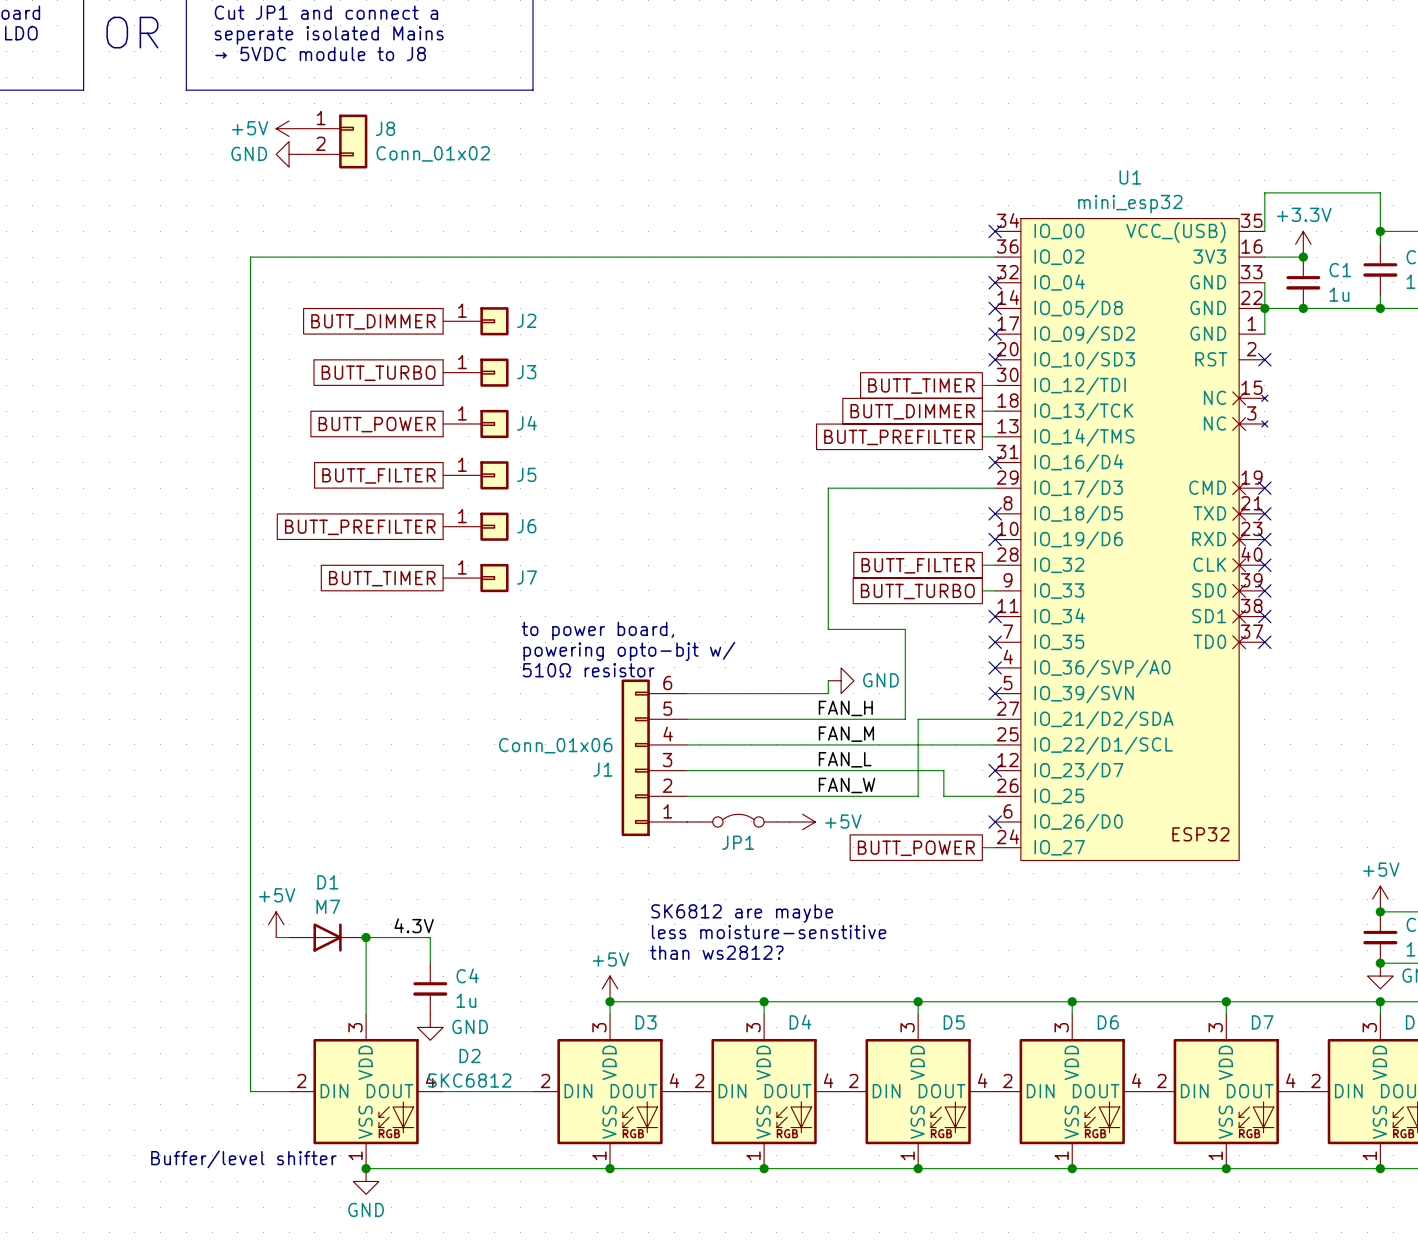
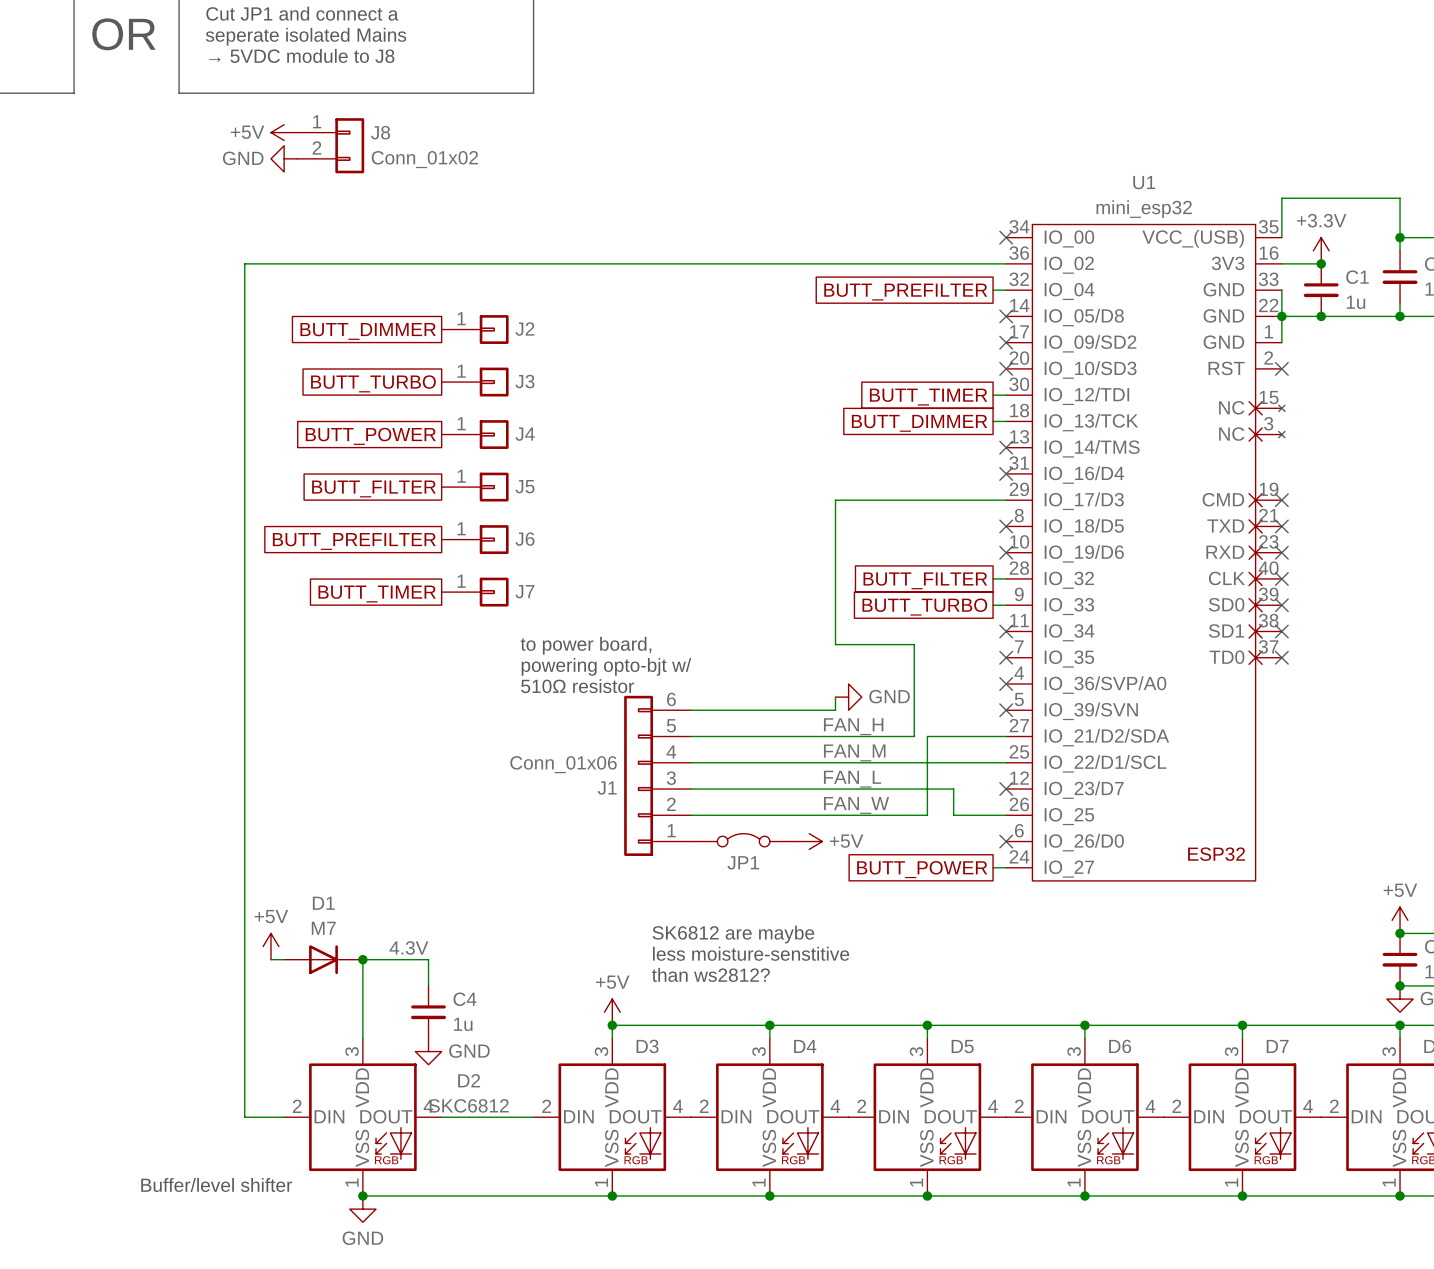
no-connect mark: (995, 282) -> none
wire: (982, 436) (995, 436) -> (993, 290) (1006, 290)
no-connect mark: none -> (1006, 447)
global label position: BUTT_PREFILTER (899, 437) -> BUTT_PREFILTER (905, 292)

